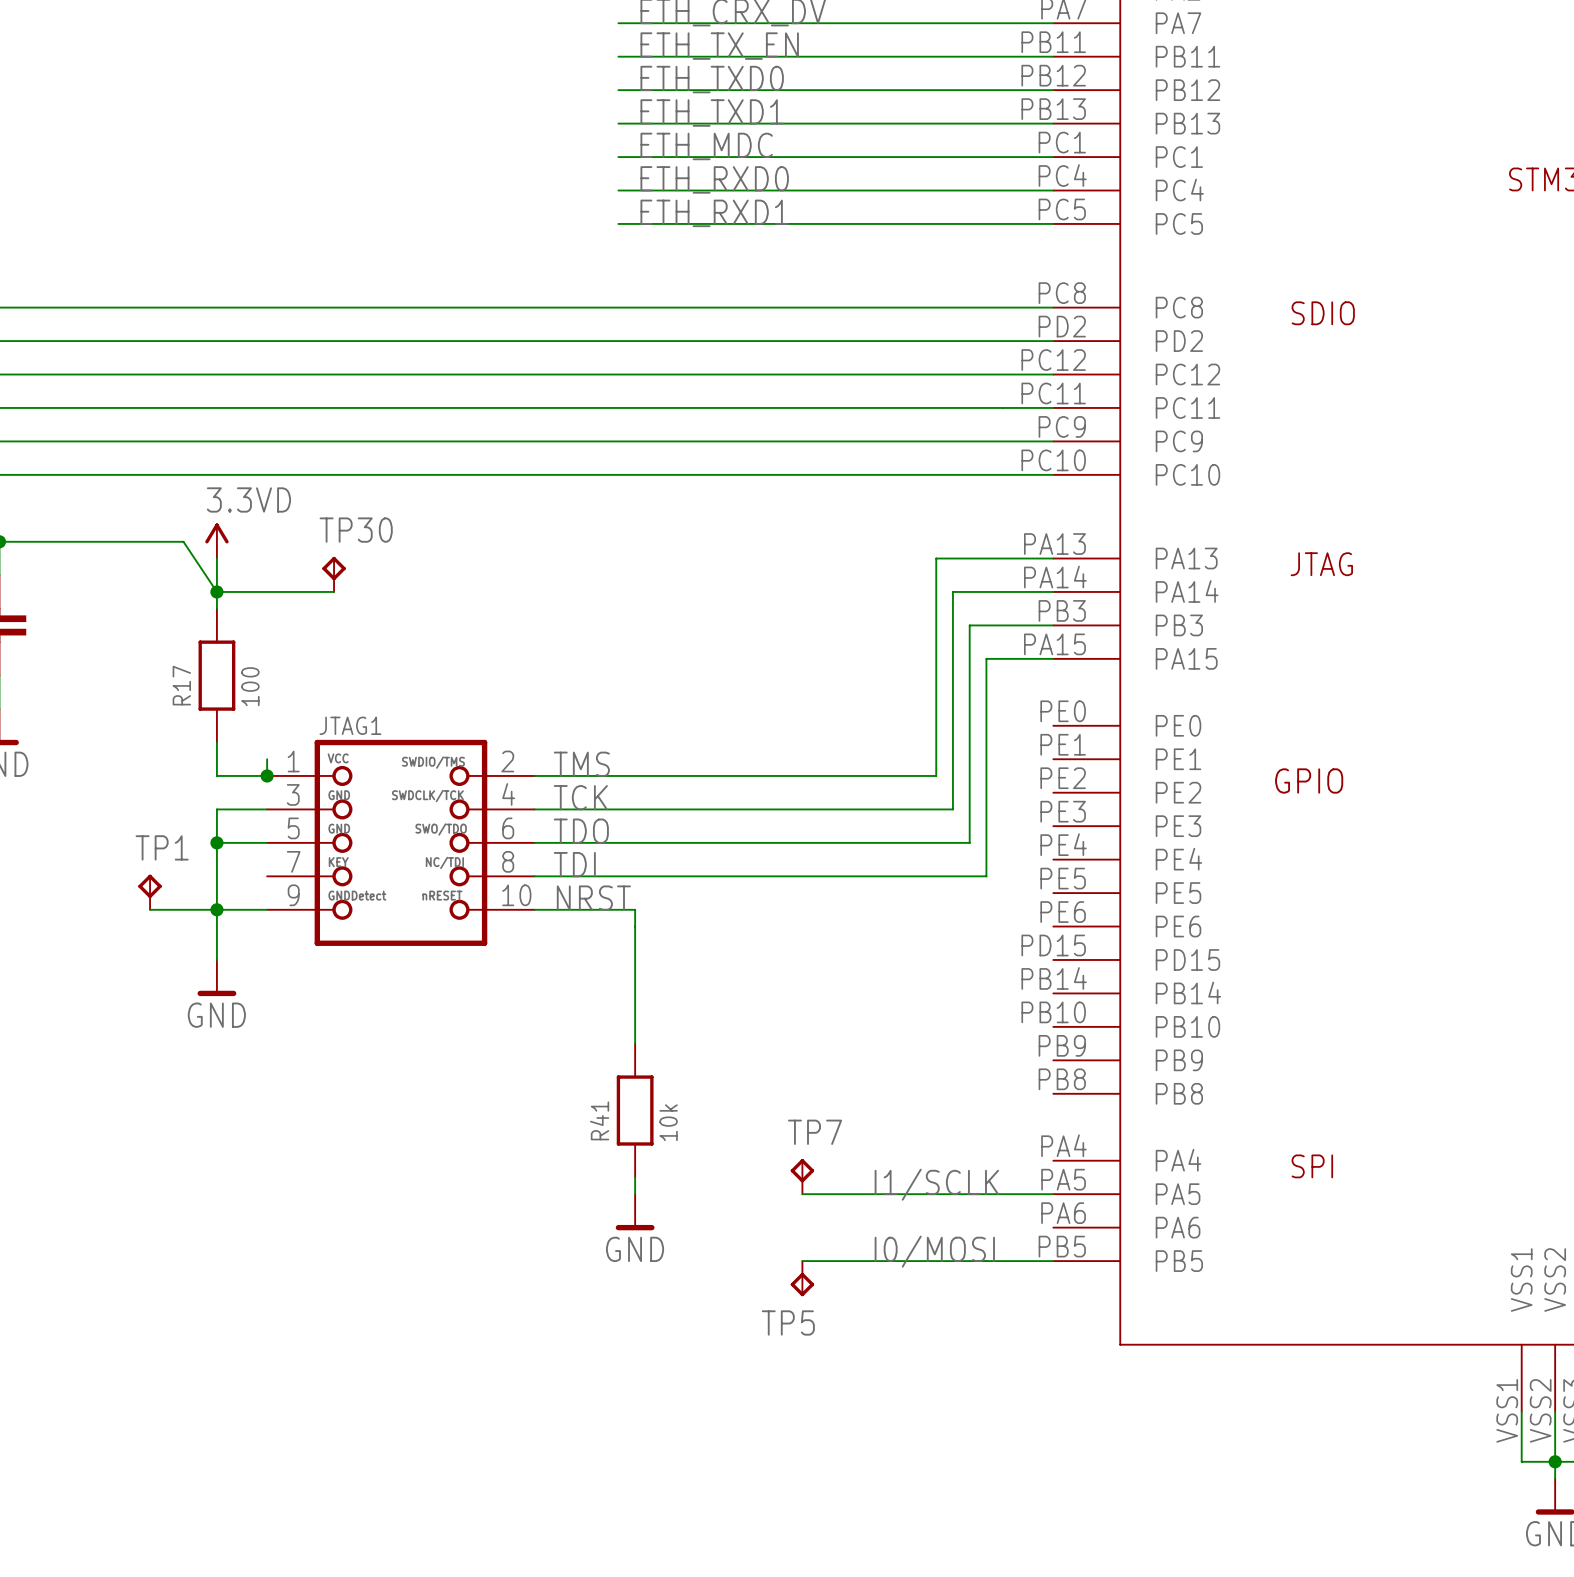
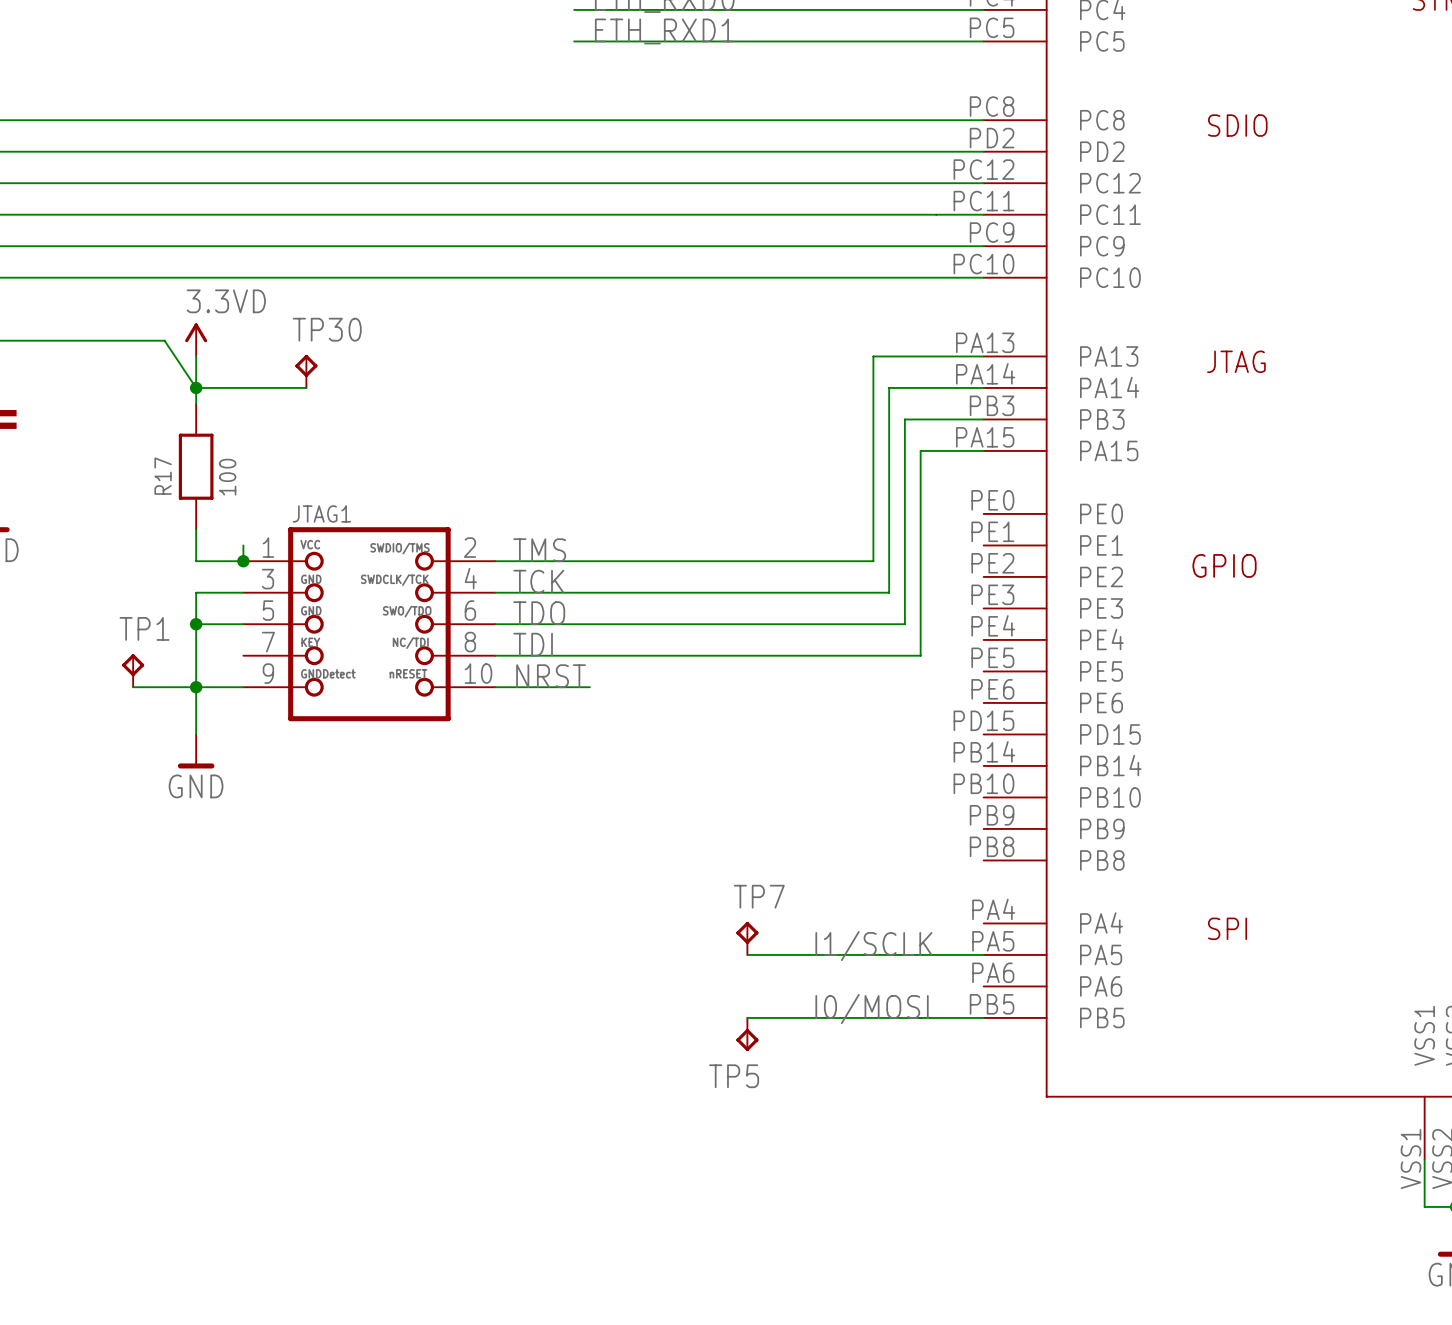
wire: (635, 909) (635, 1043) -> none
R41: 10k (635, 1110) -> none
wire: (635, 1177) (635, 1194) -> none
power symbol: GND (635, 1212) -> none

